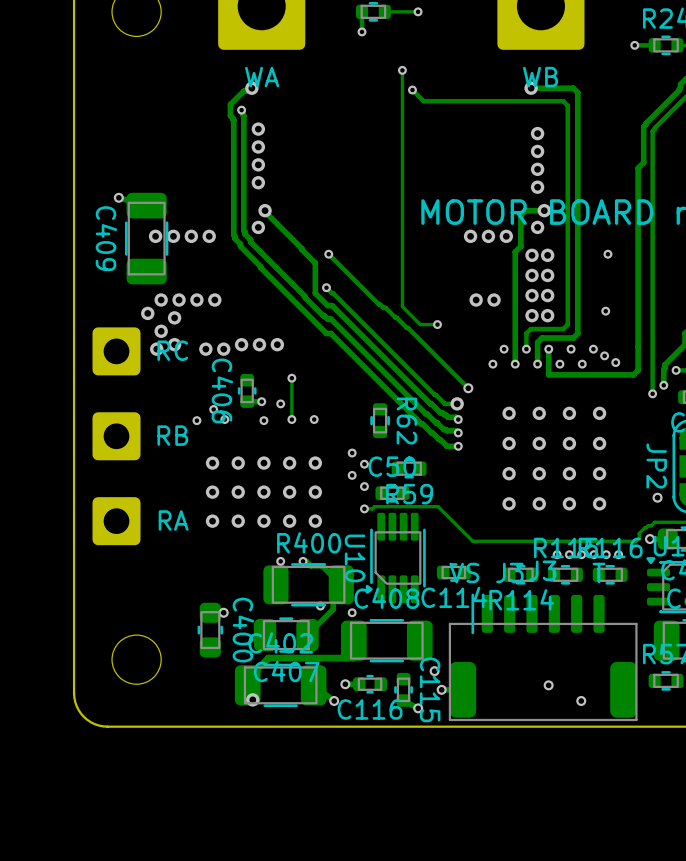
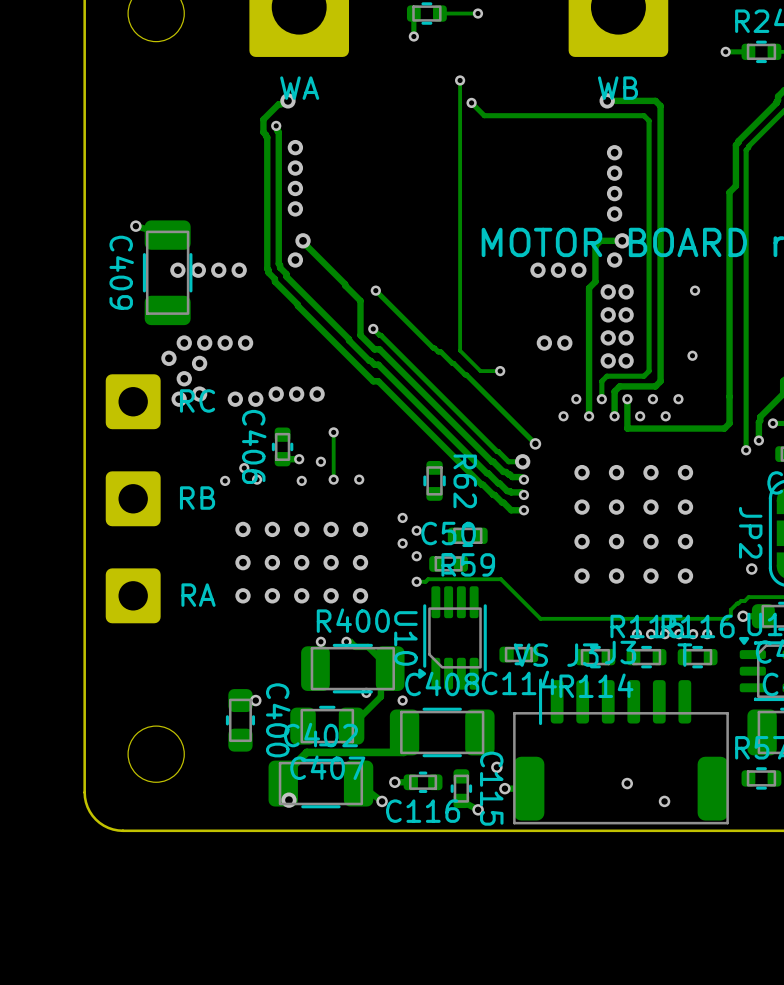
via: (604, 355) -> none
via: (615, 362) -> none

